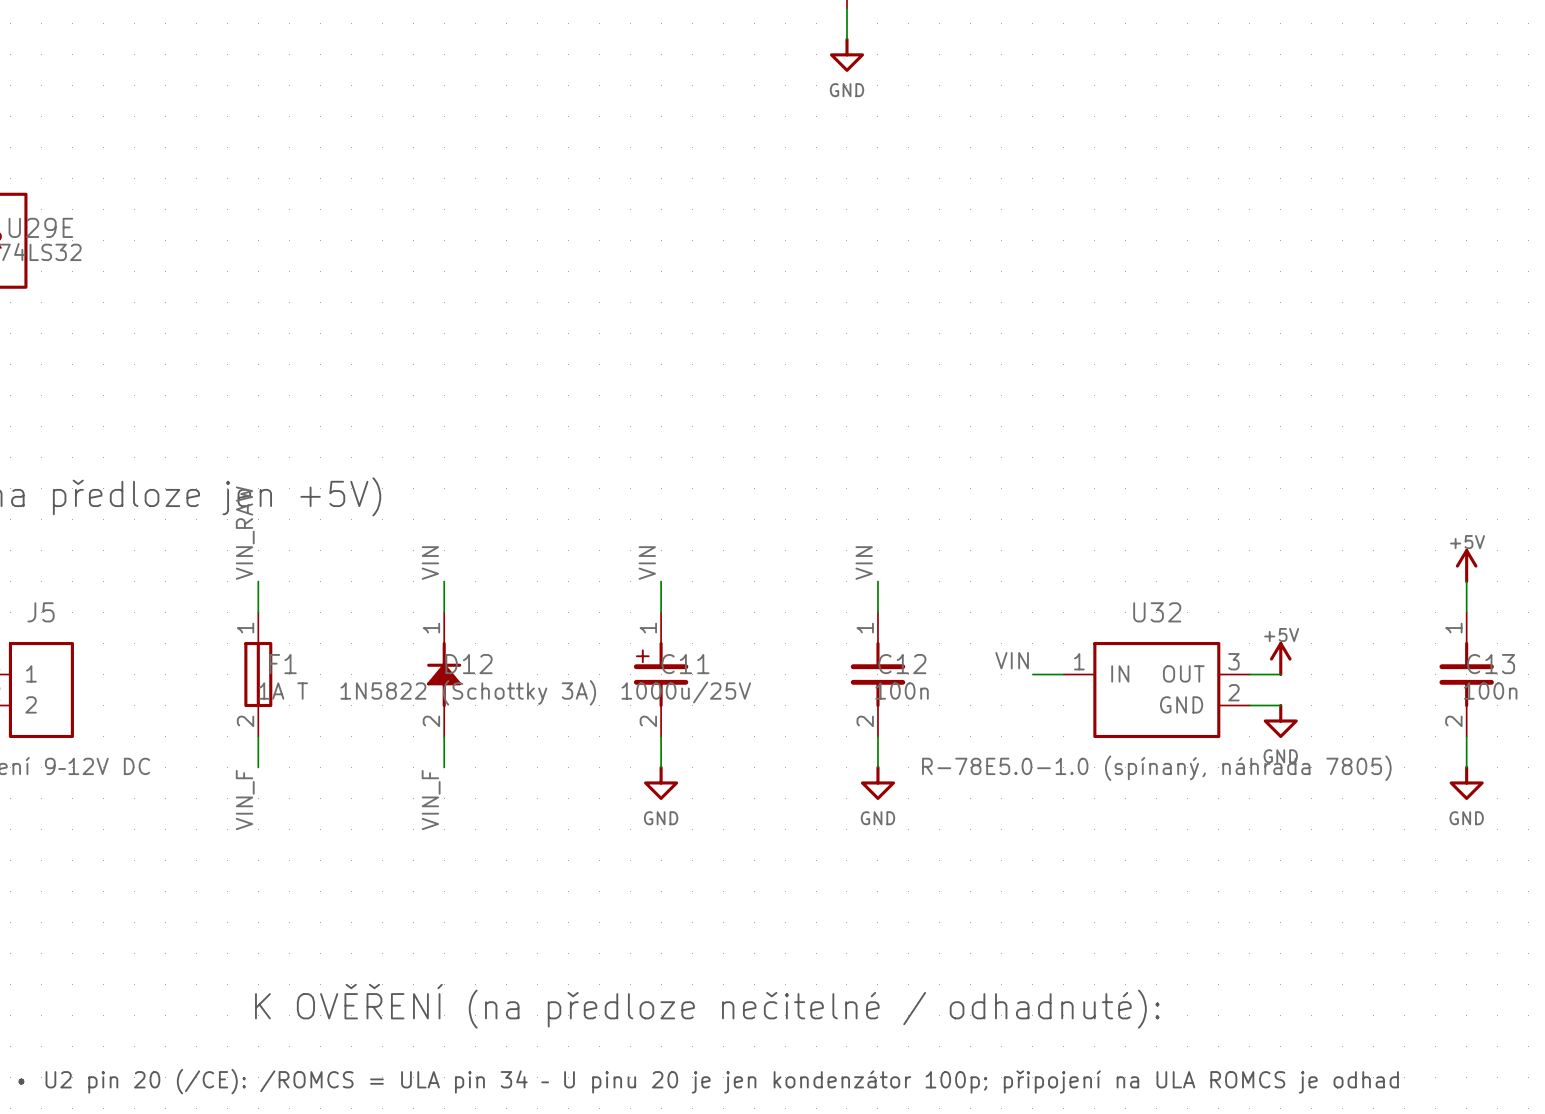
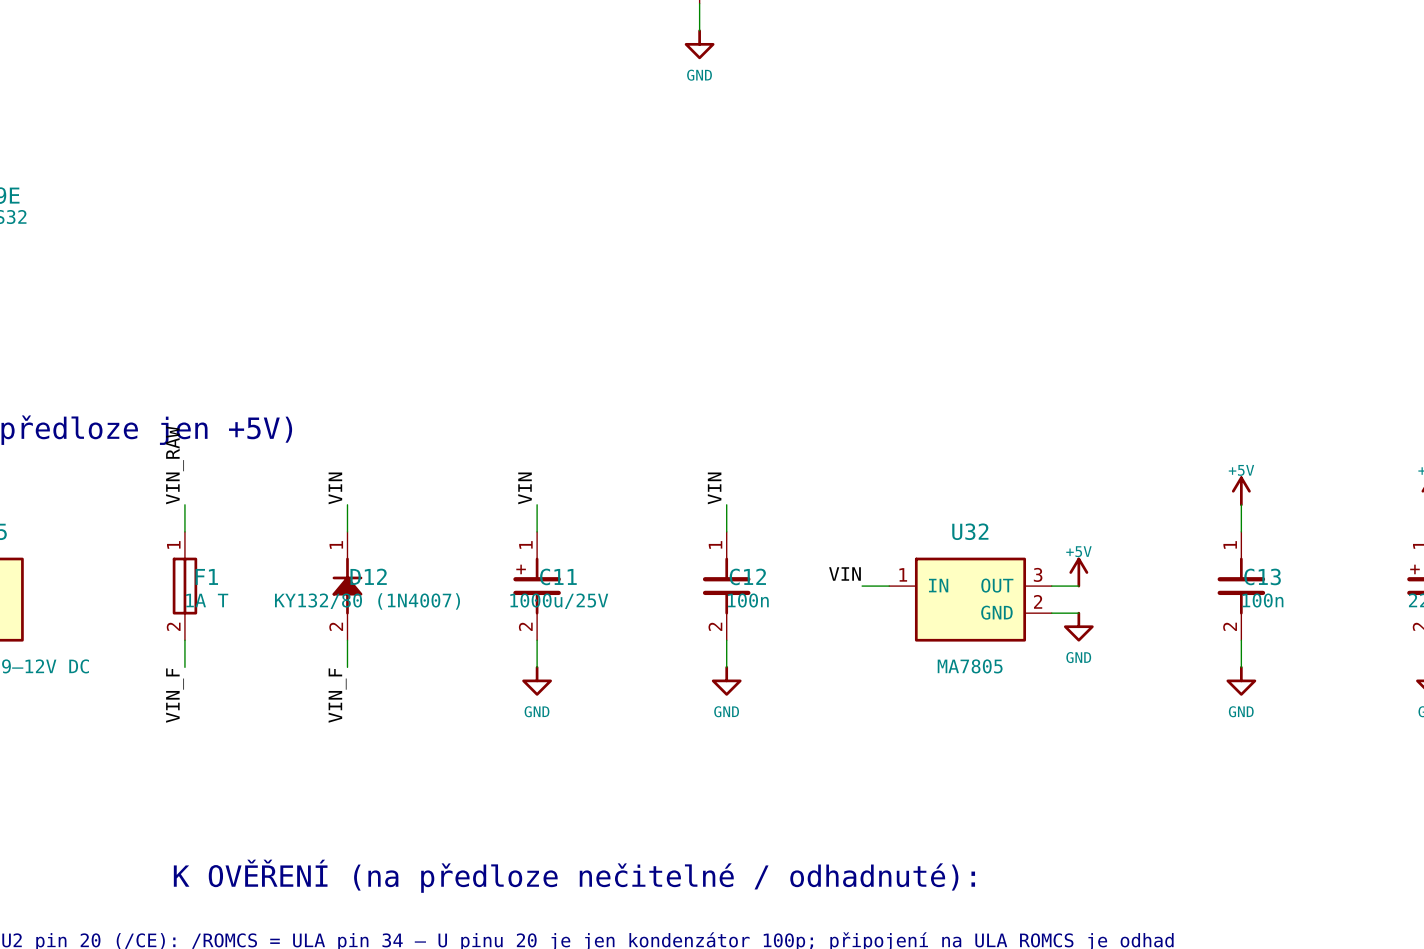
D12 value: 1N5822 (Schottky 3A) (468, 692) -> KY132/80 (1N4007) (367, 601)
U32 value: R-78E5.0-1.0 (spínaný, náhrada 7805) (1156, 768) -> MA7805 (970, 666)

